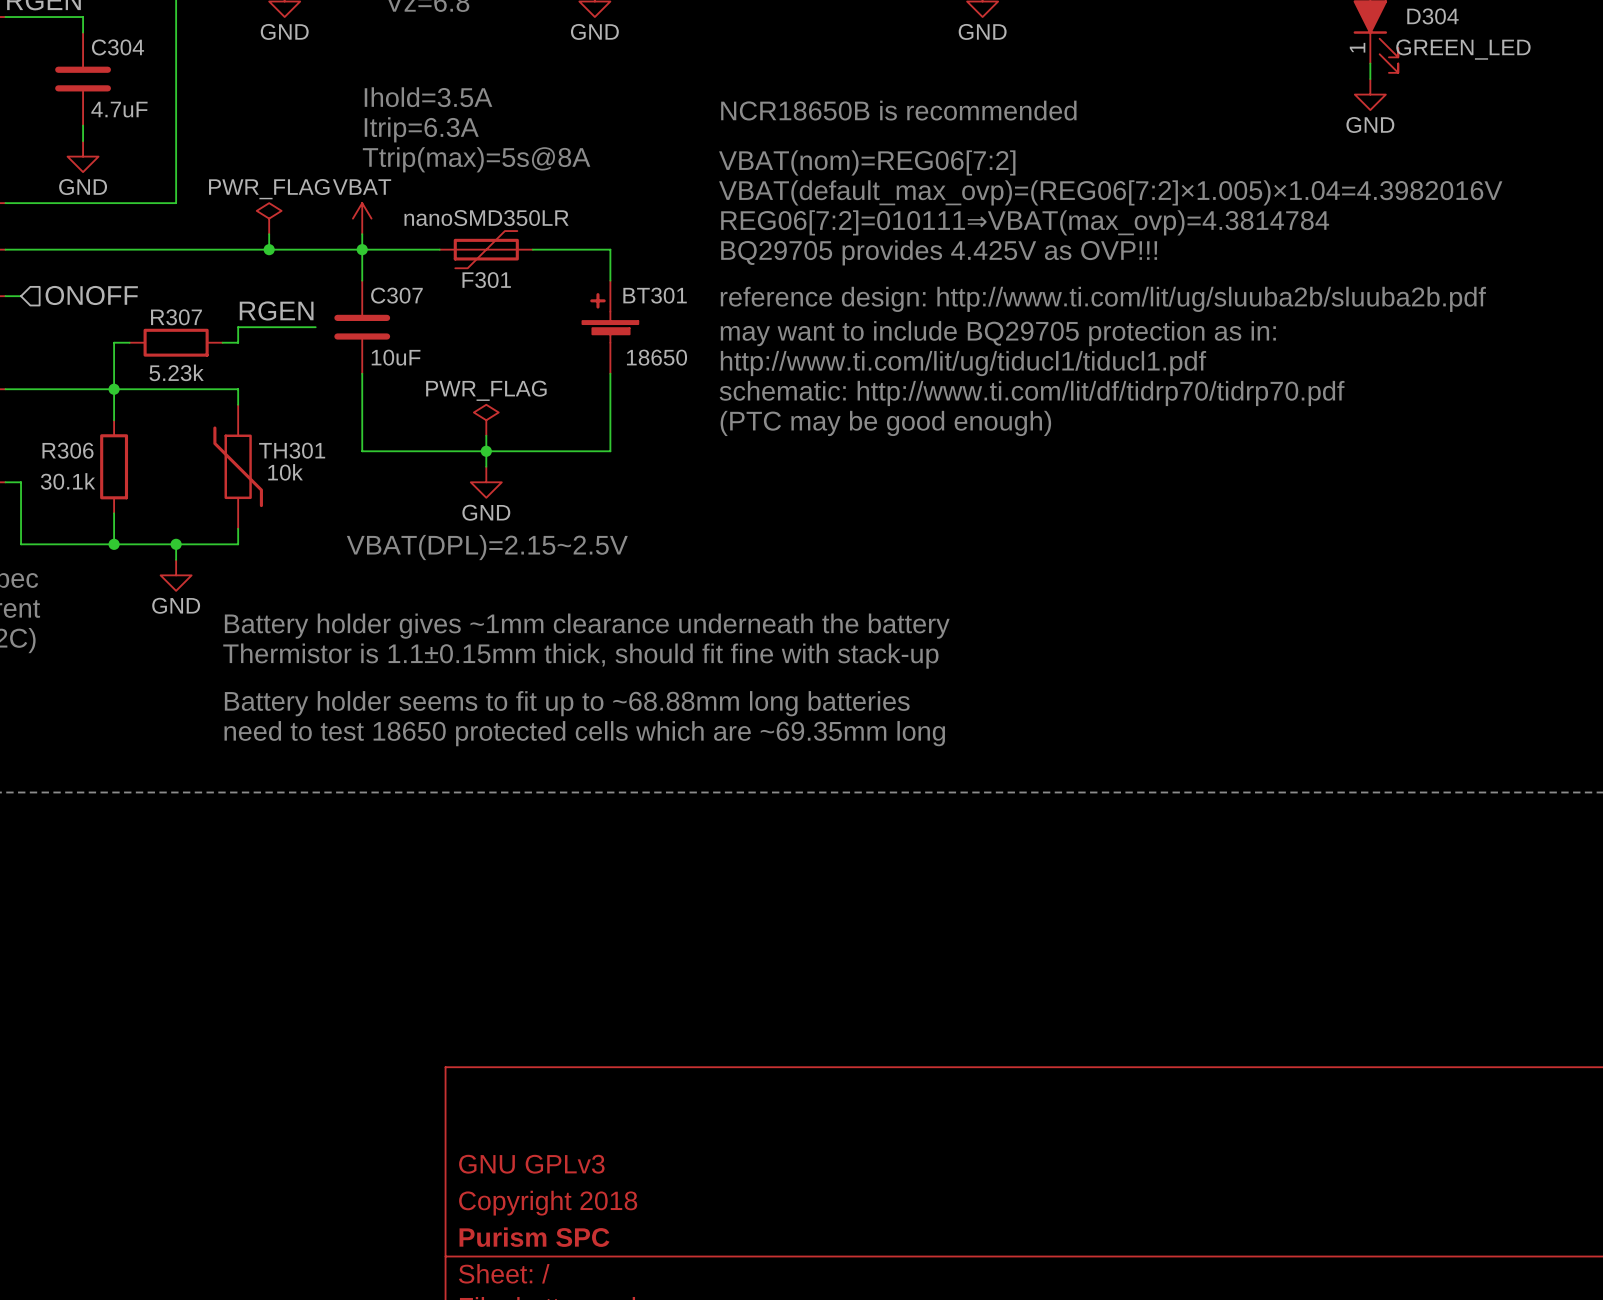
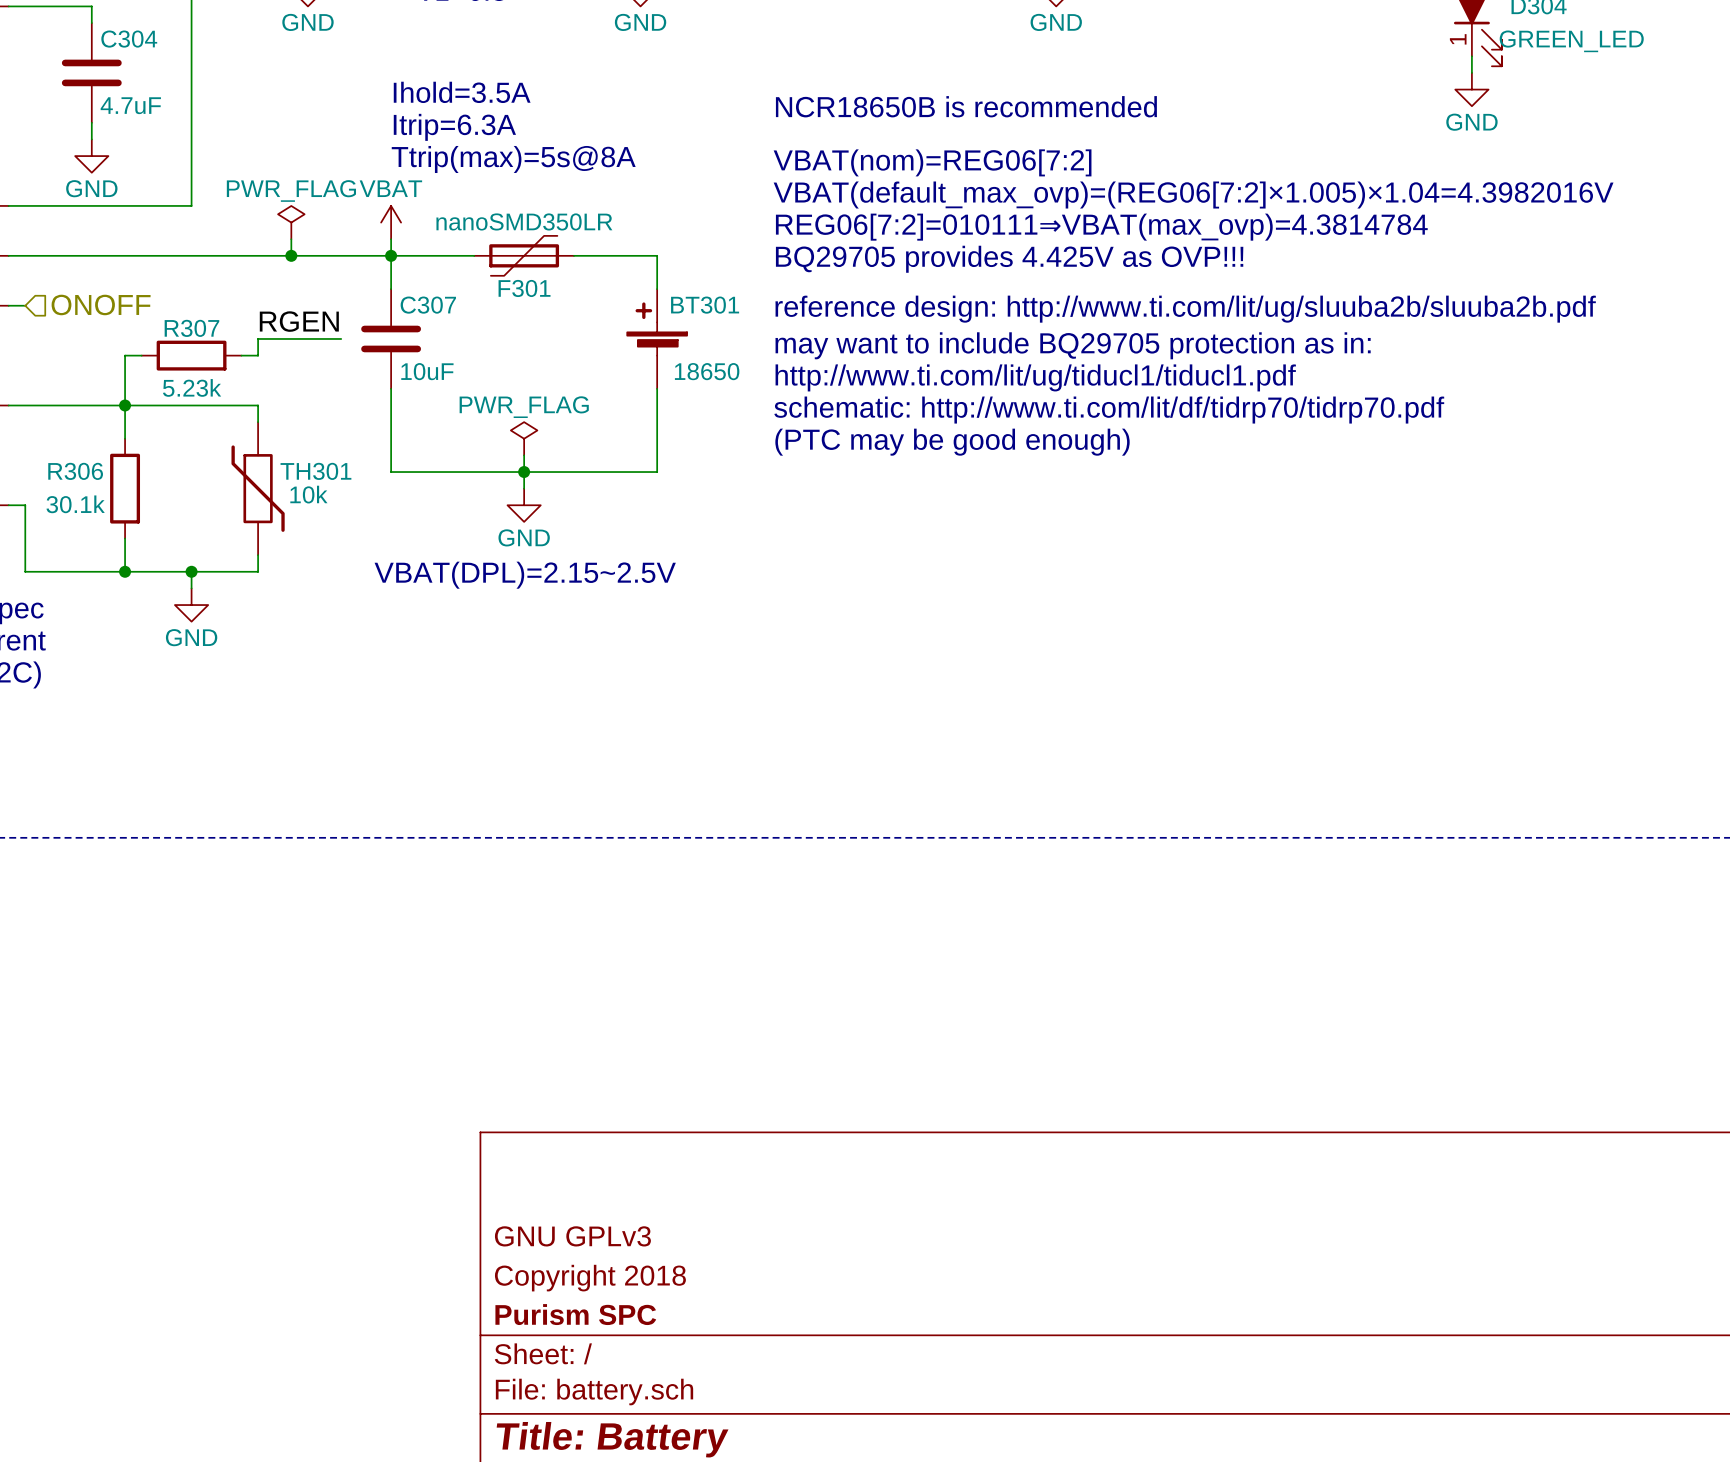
text: Battery holder gives ~1mm clearance underneath the battery (587, 626) -> none
text: Thermistor is 1.1±0.15mm thick, should fit fine with stack-up (580, 656) -> none
text: Battery holder seems to fit up to ~68.88mm long batteries (567, 703) -> none
text: need to test 18650 protected cells which are ~69.35mm long (584, 733) -> none

